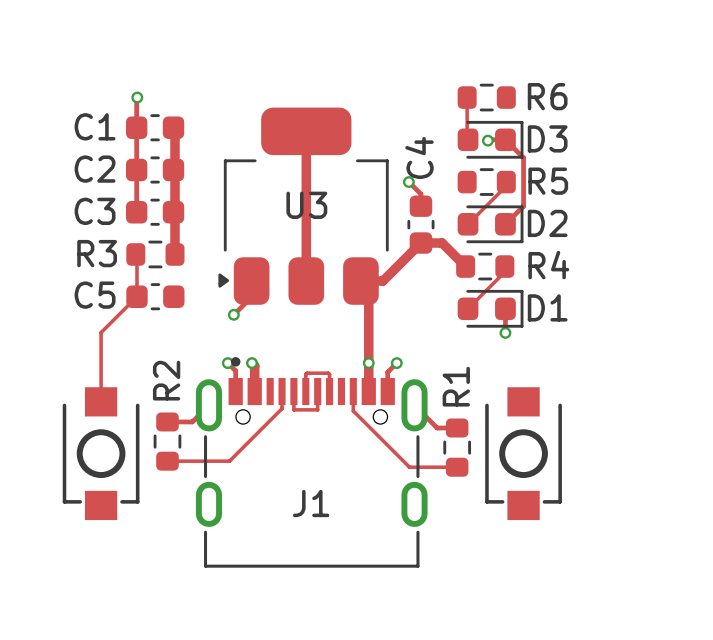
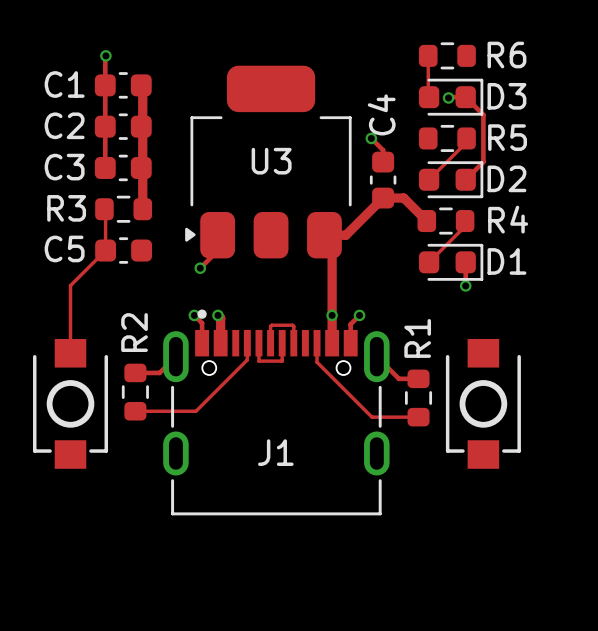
track: (306, 131) (306, 281) -> none

